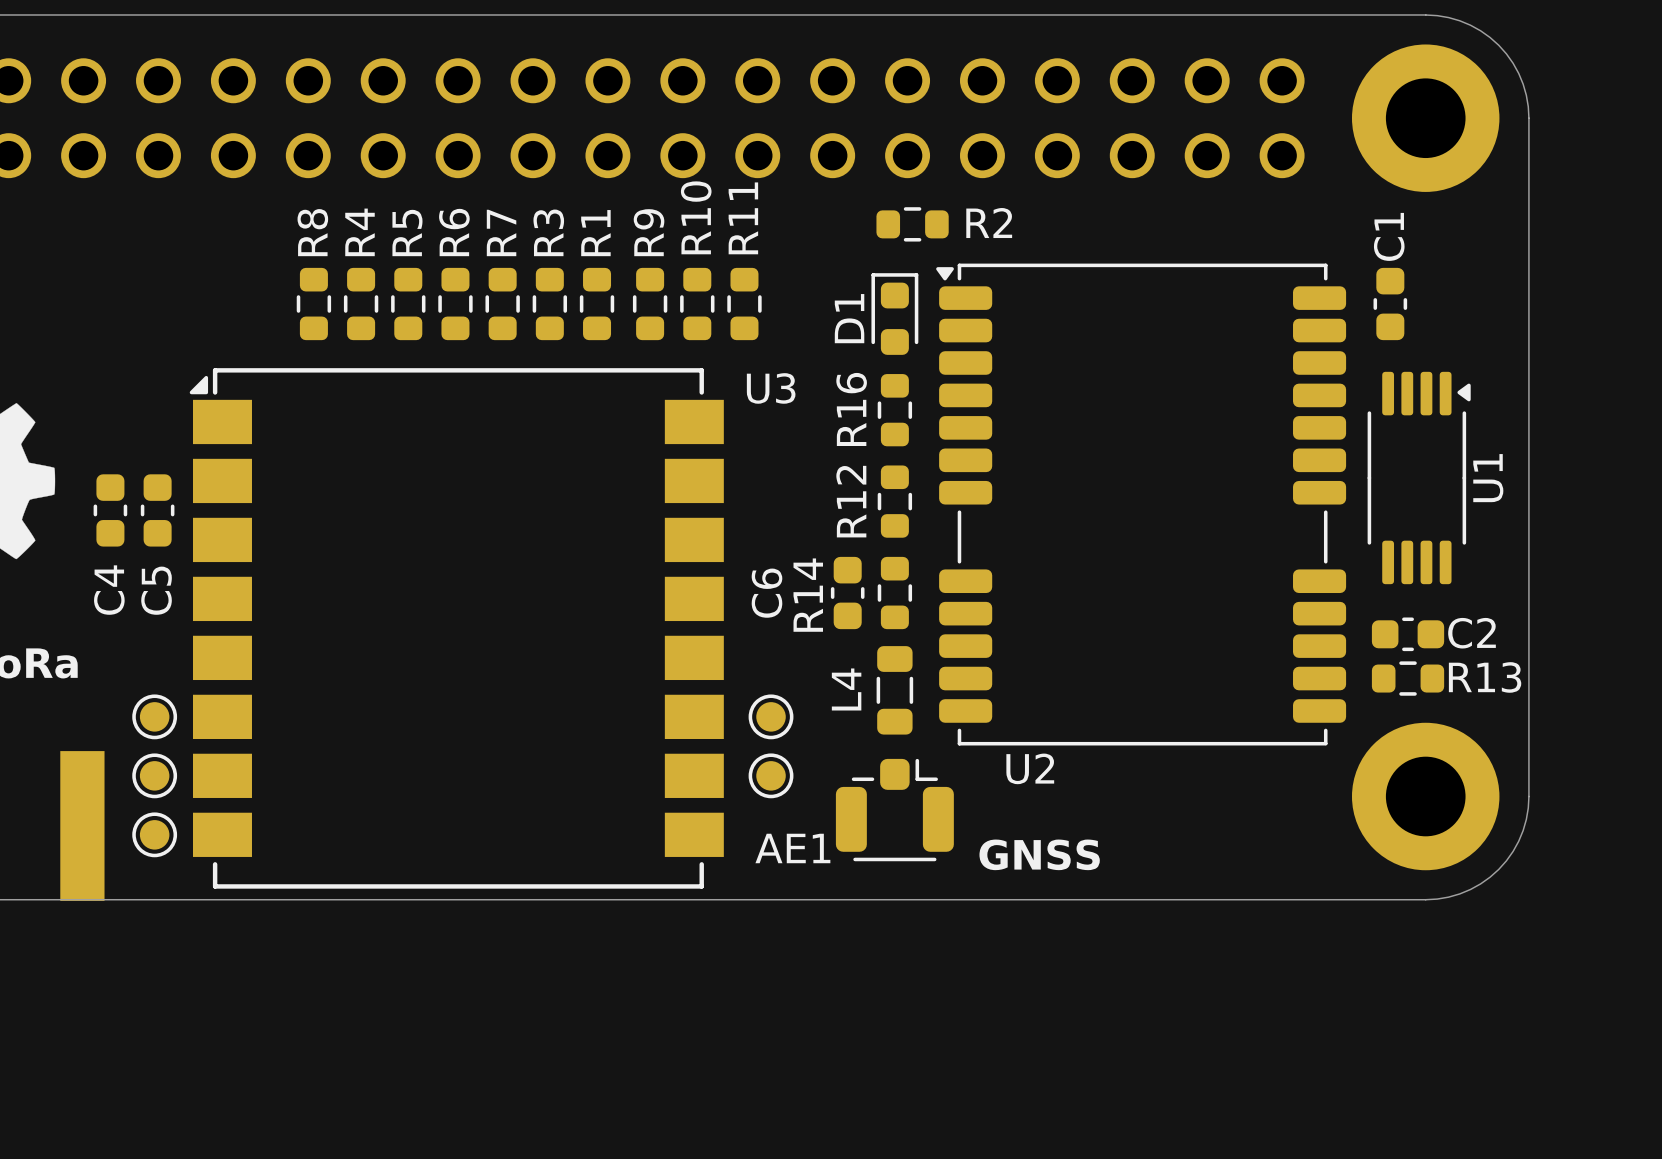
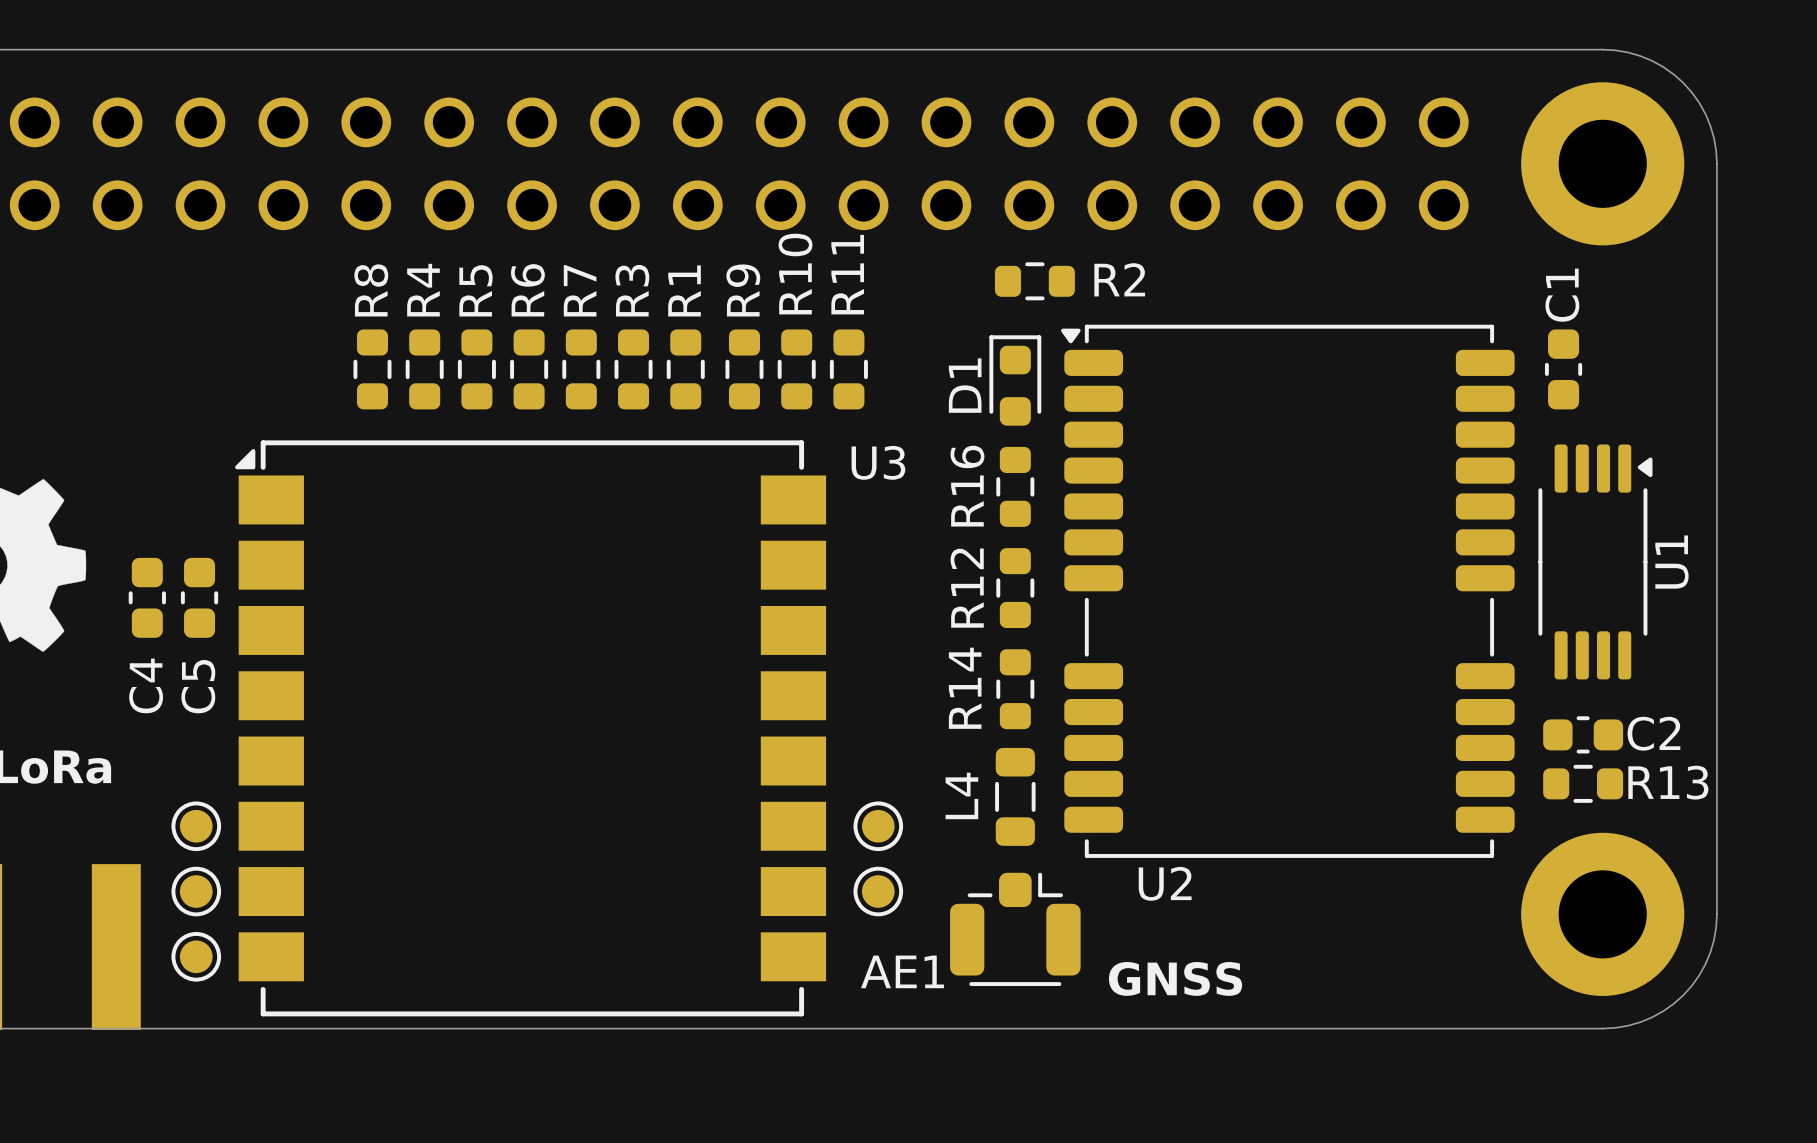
C6: (847, 593) -> none
R14 name position: R14 (808, 595) -> R14 (965, 688)

